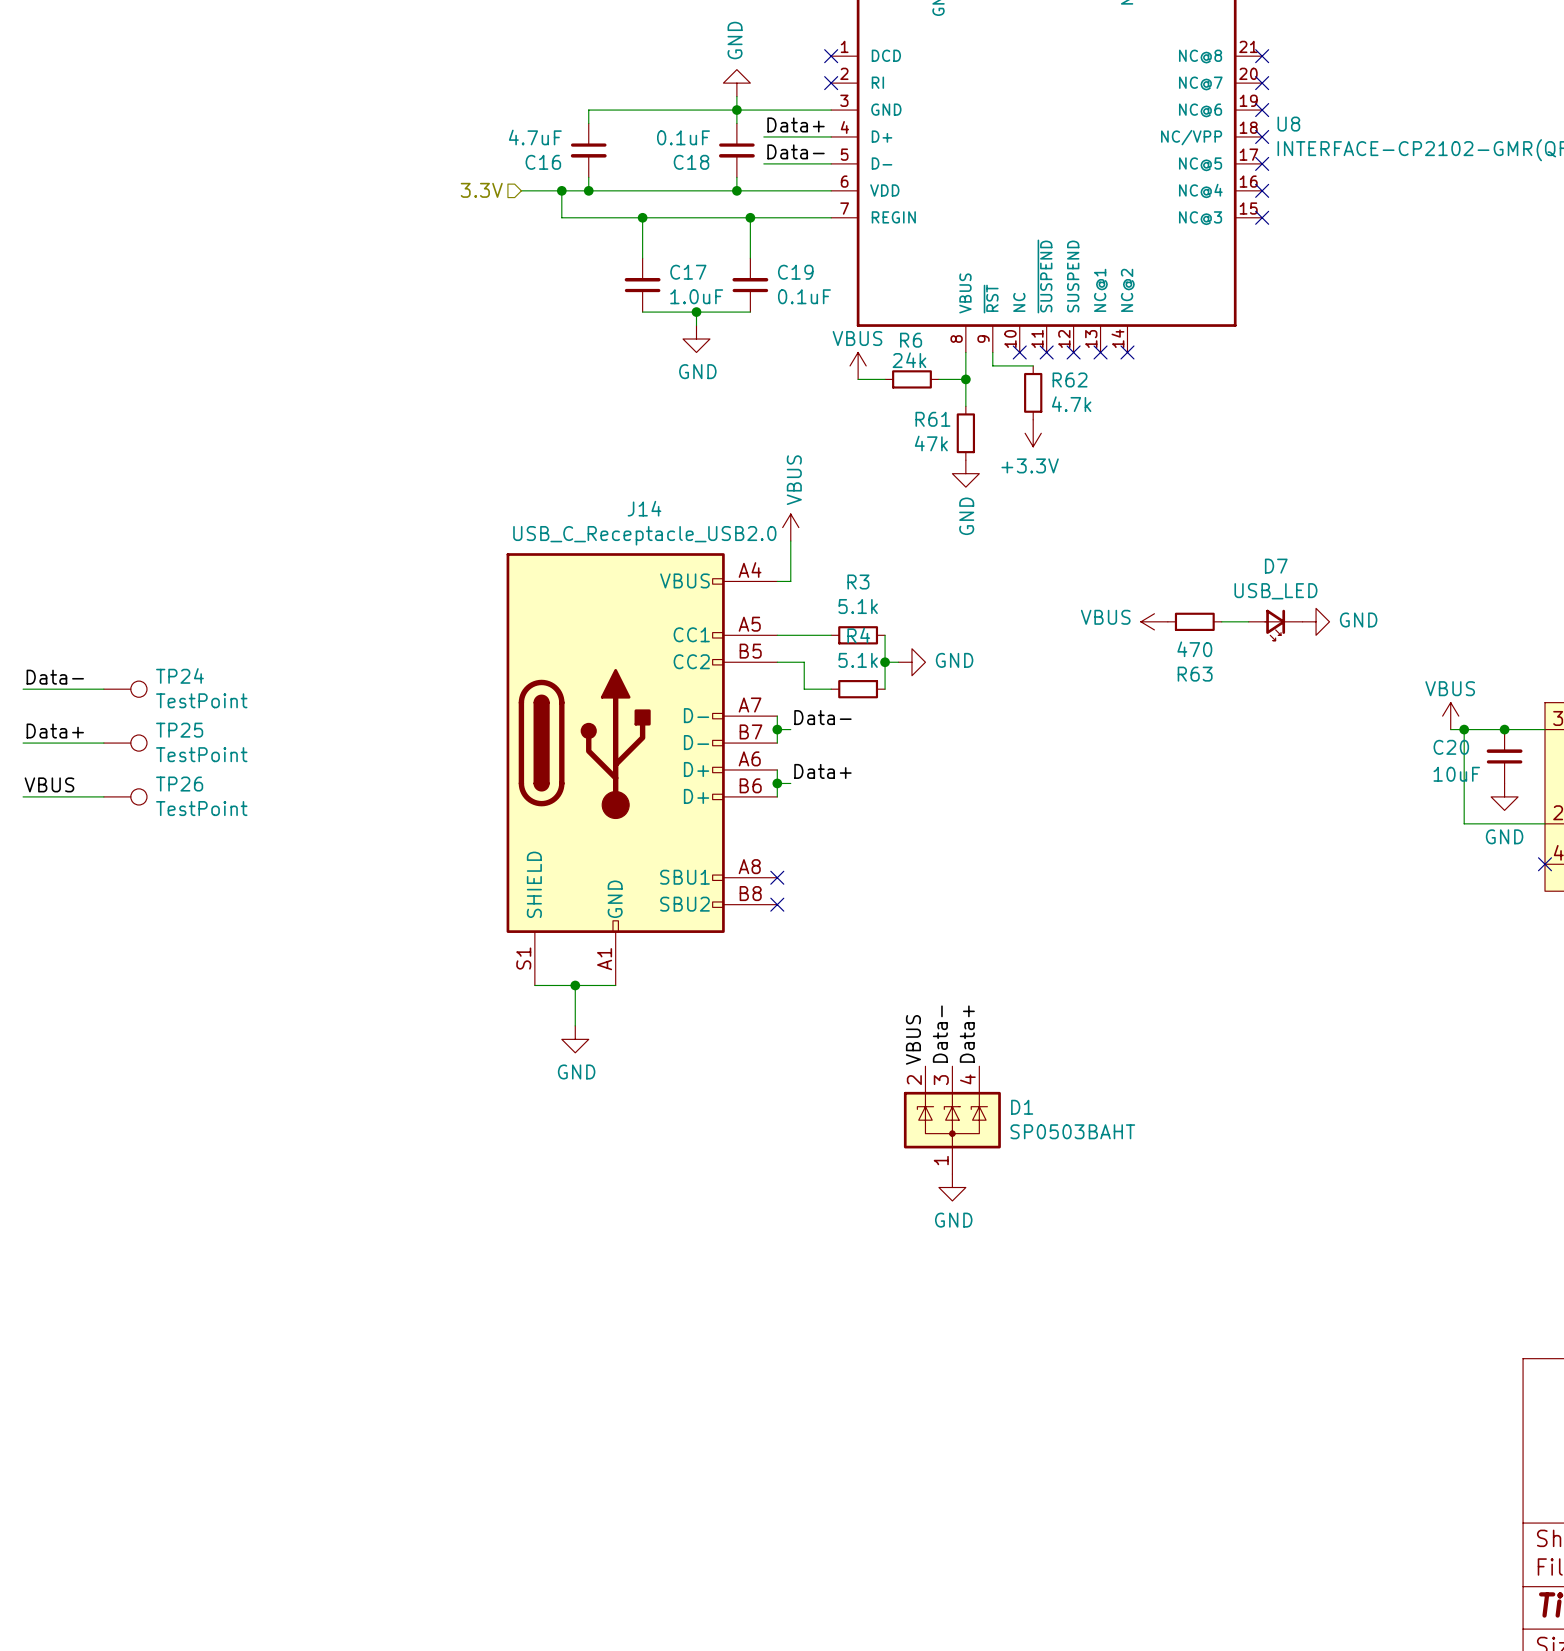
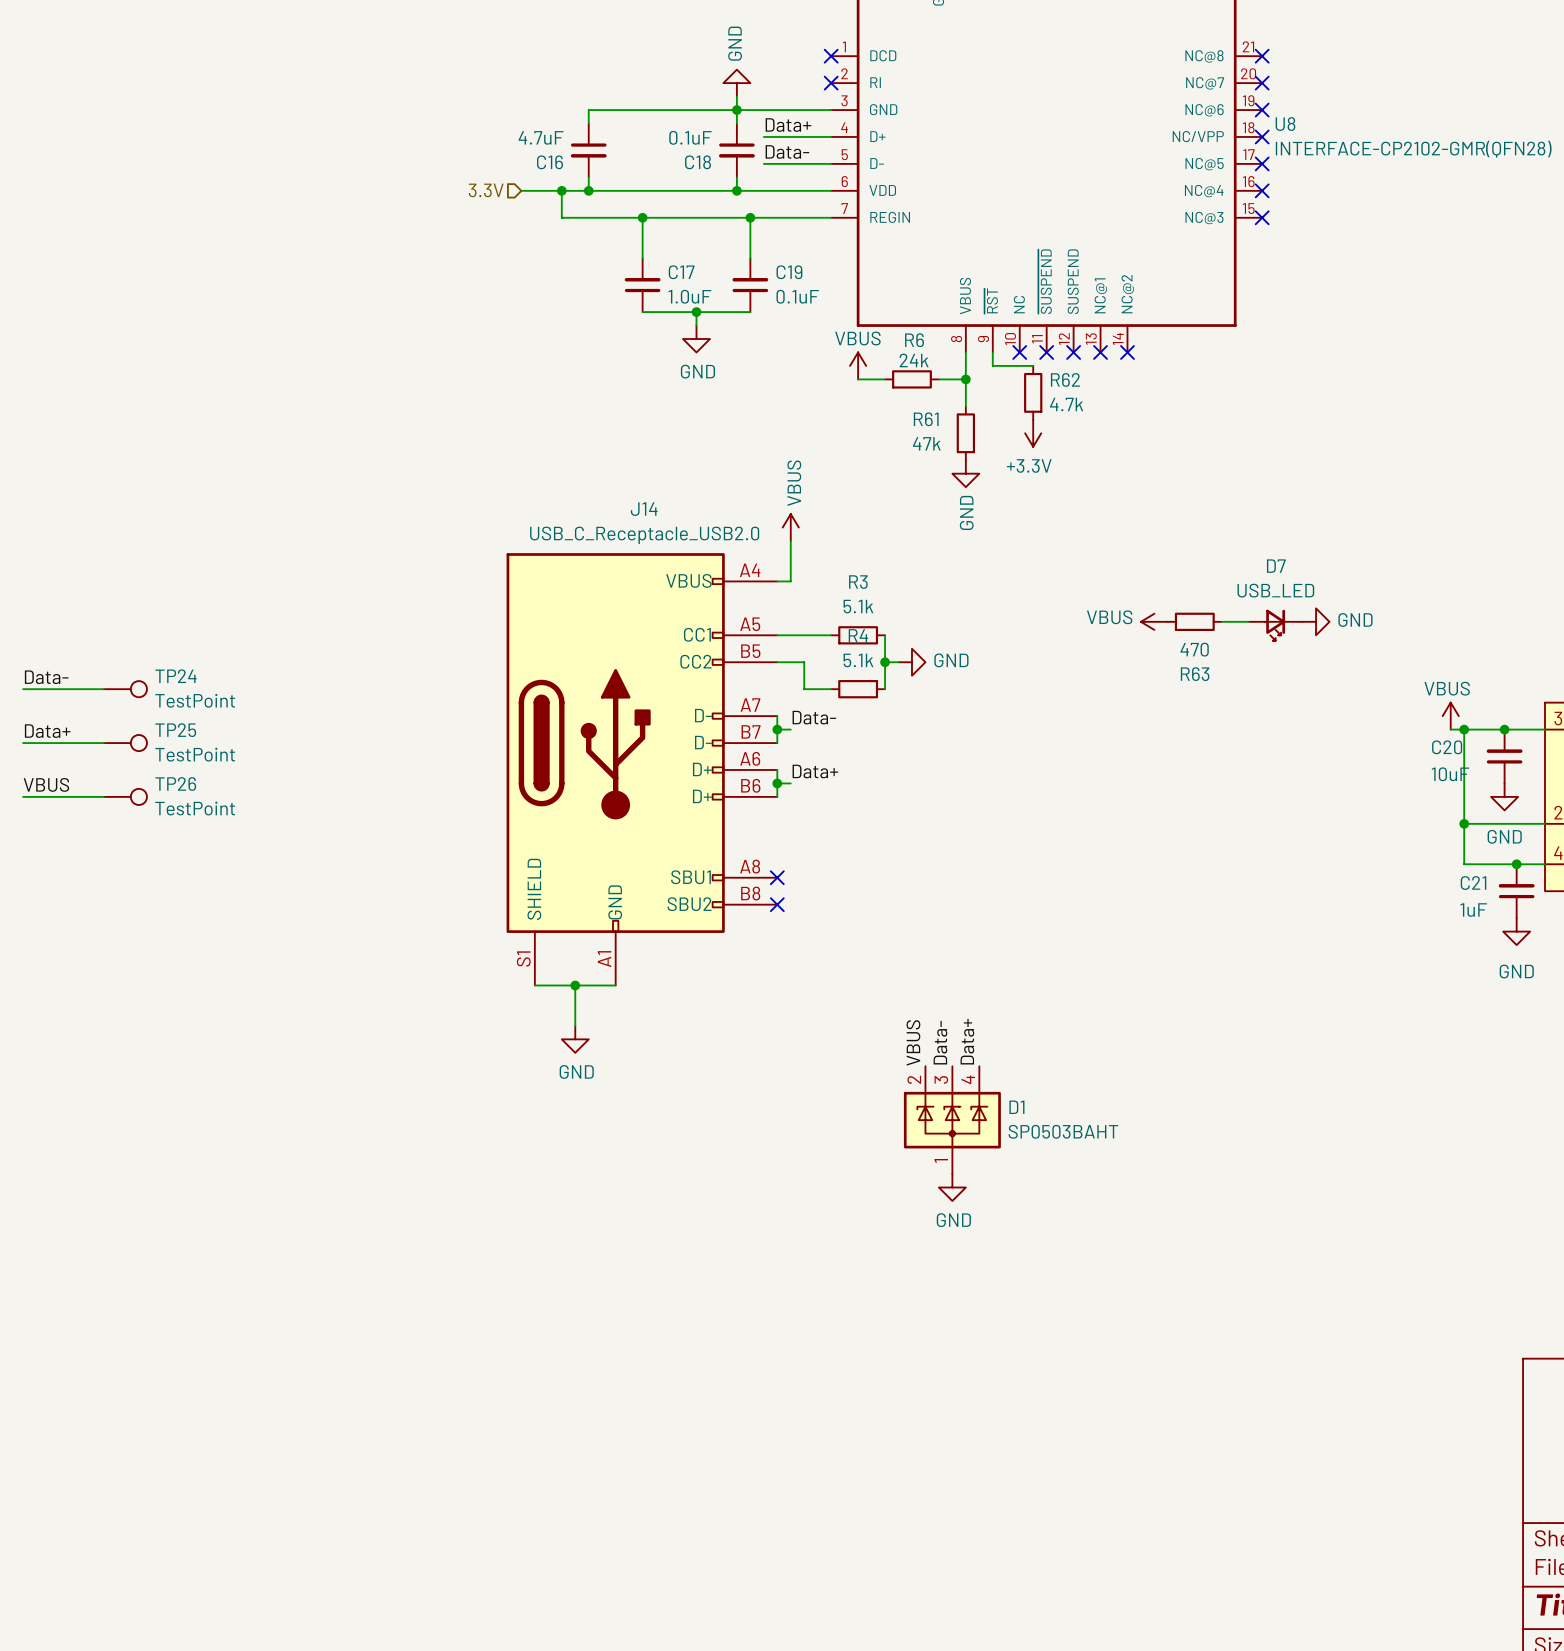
wire: none -> (1464, 823) (1464, 864) (1544, 864)
junction: none -> (1464, 823)
junction: none -> (1516, 864)
no-connect mark: (1544, 864) -> none
C21: none -> 1uF (1516, 891)
power symbol: none -> GND (1516, 931)

